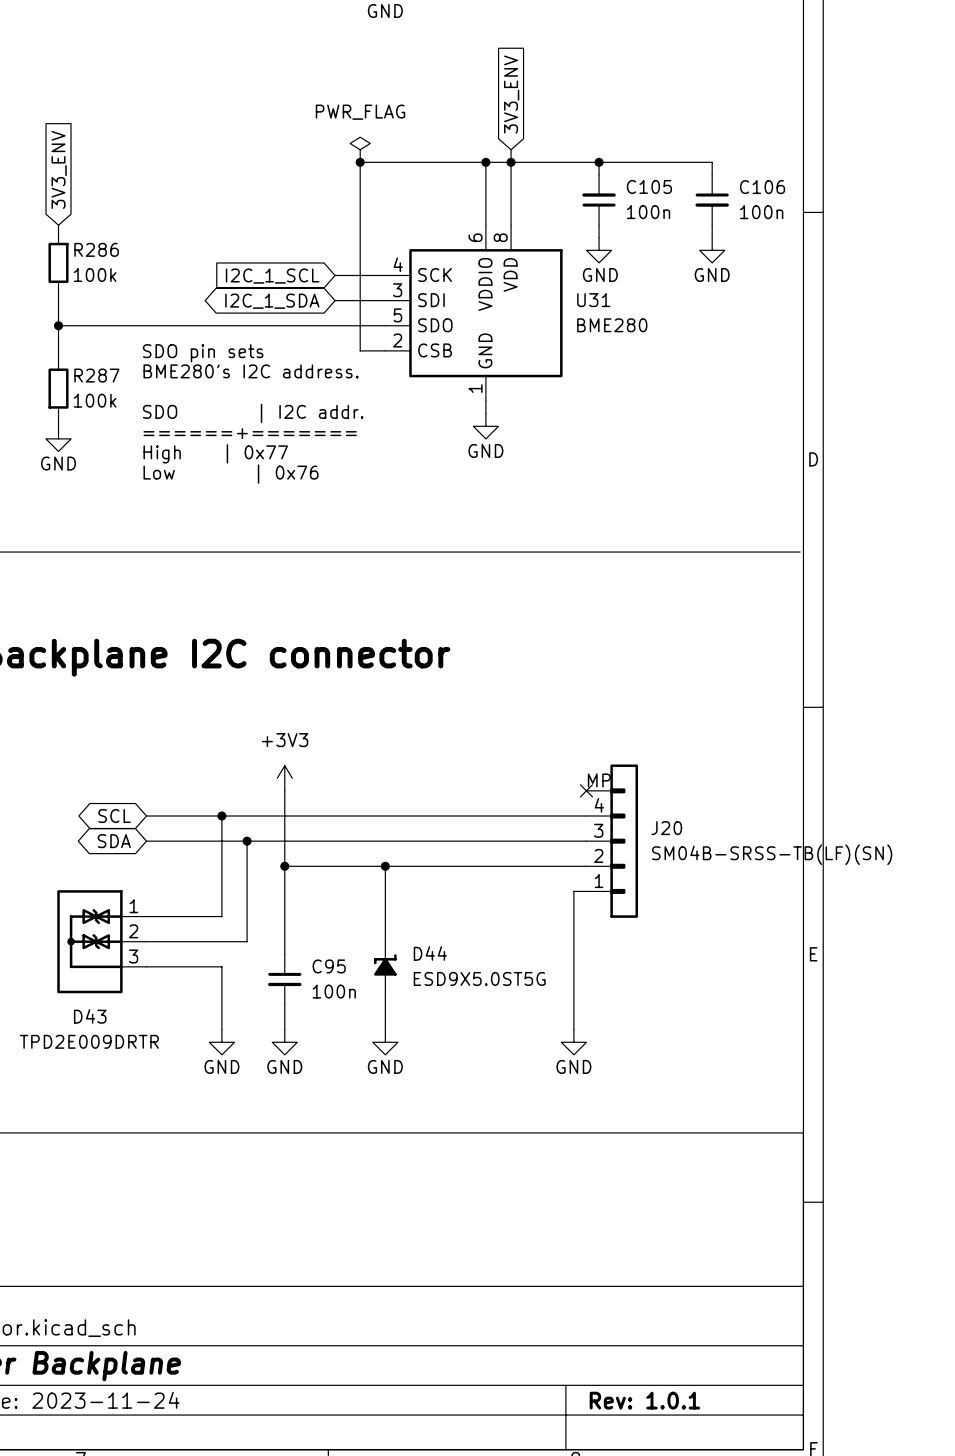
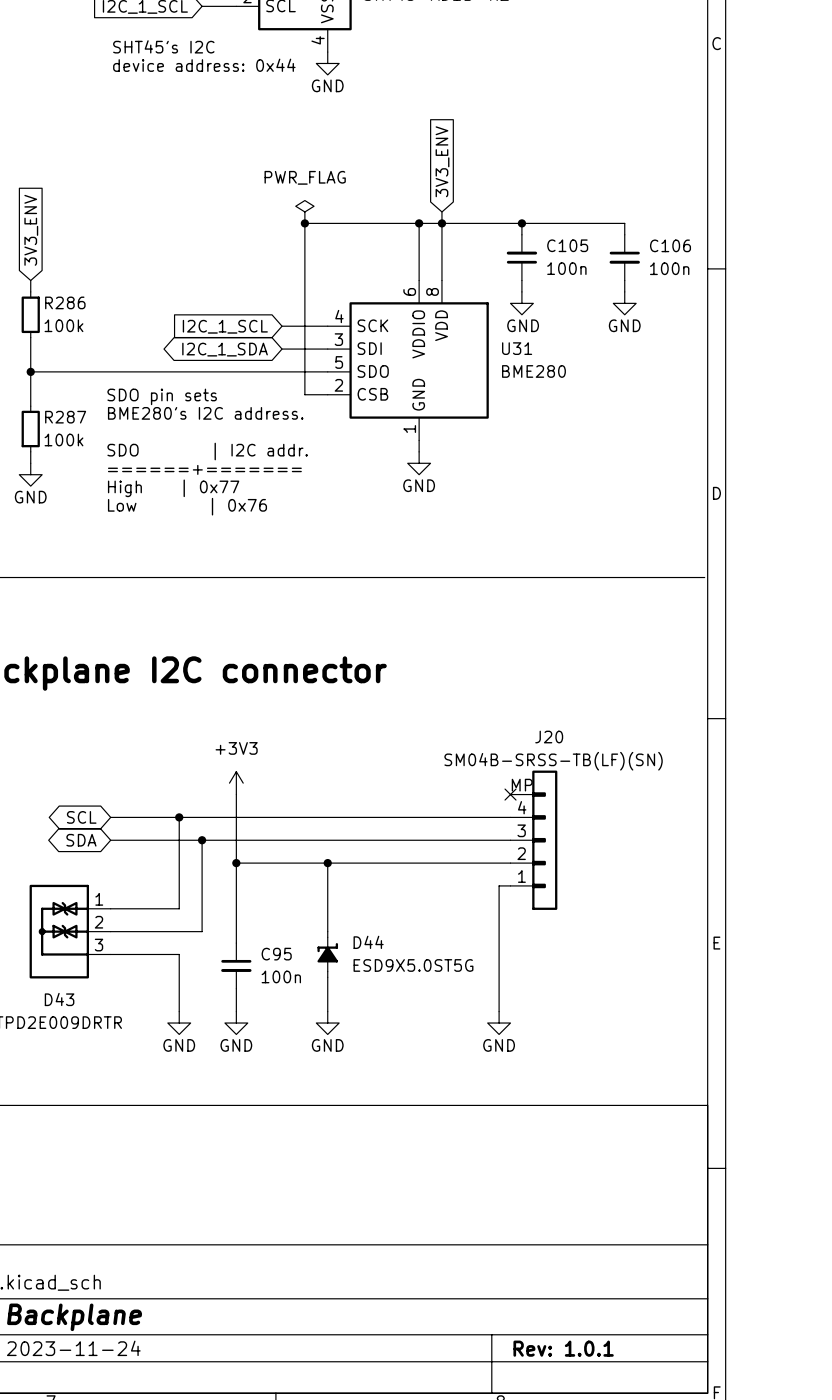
J20 name position: J20 (666, 828) -> J20 (549, 737)
J20 text position: SM04B-SRSS-TB(LF)(SN) (772, 854) -> SM04B-SRSS-TB(LF)(SN) (553, 761)

